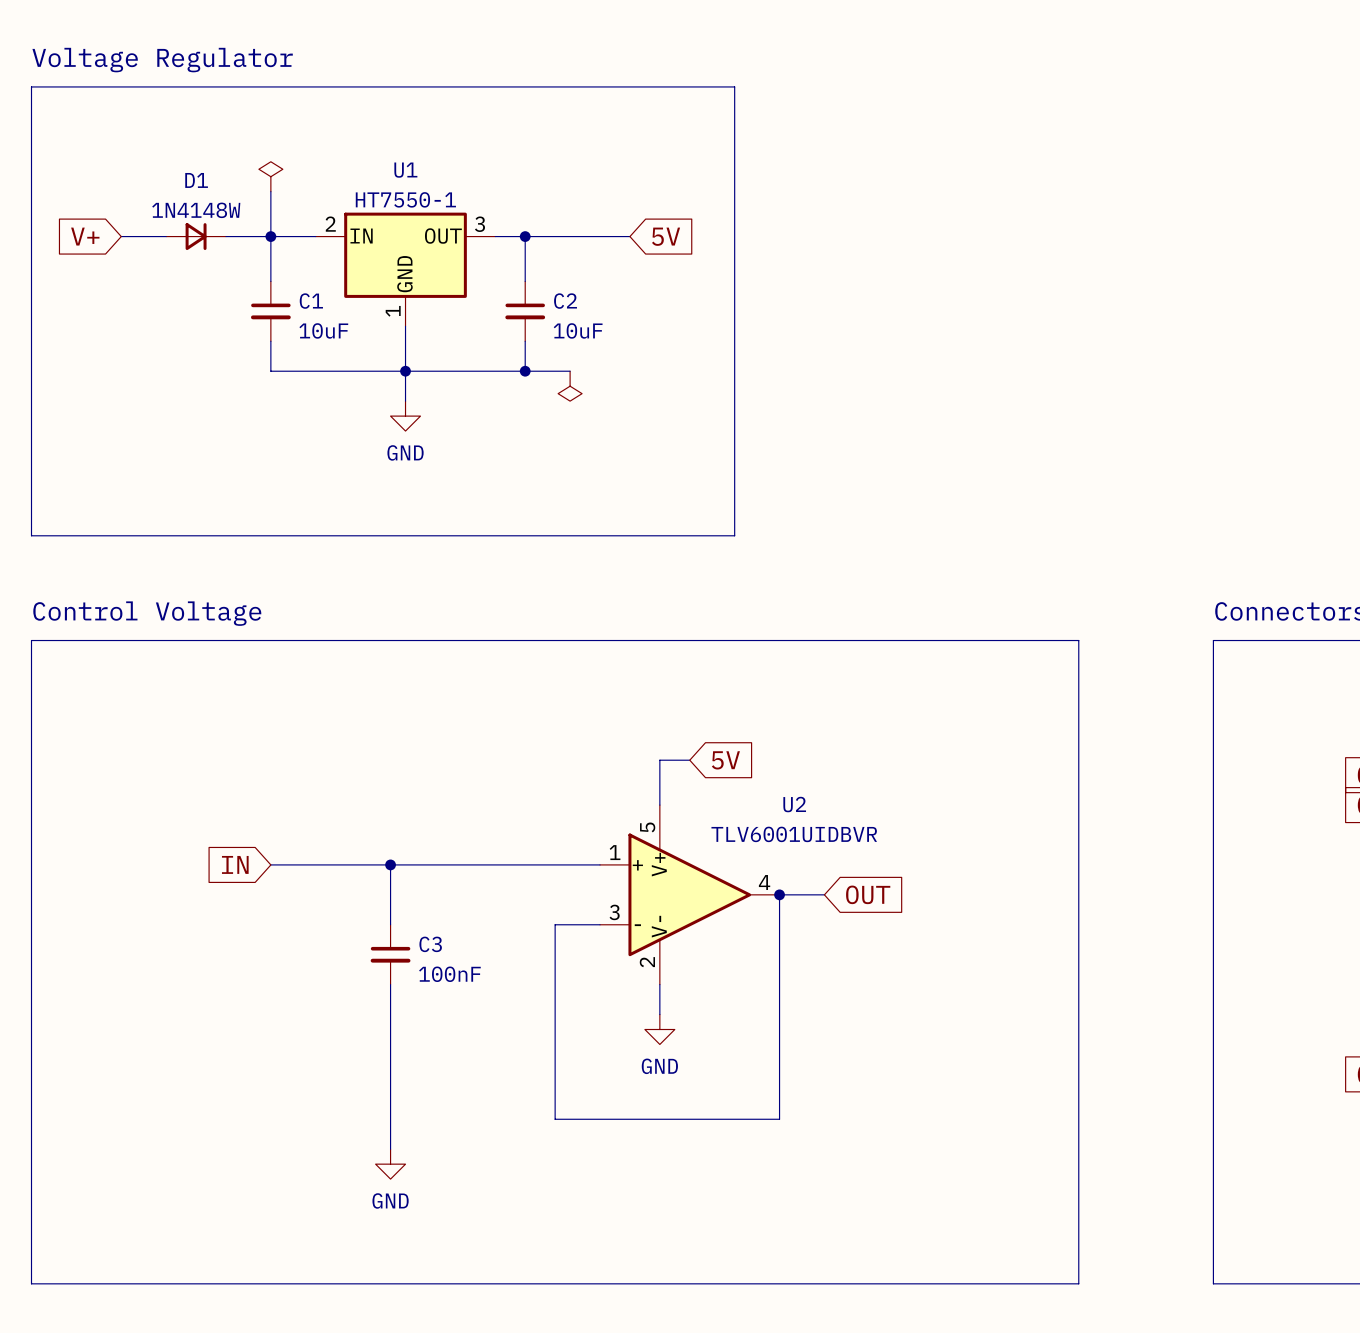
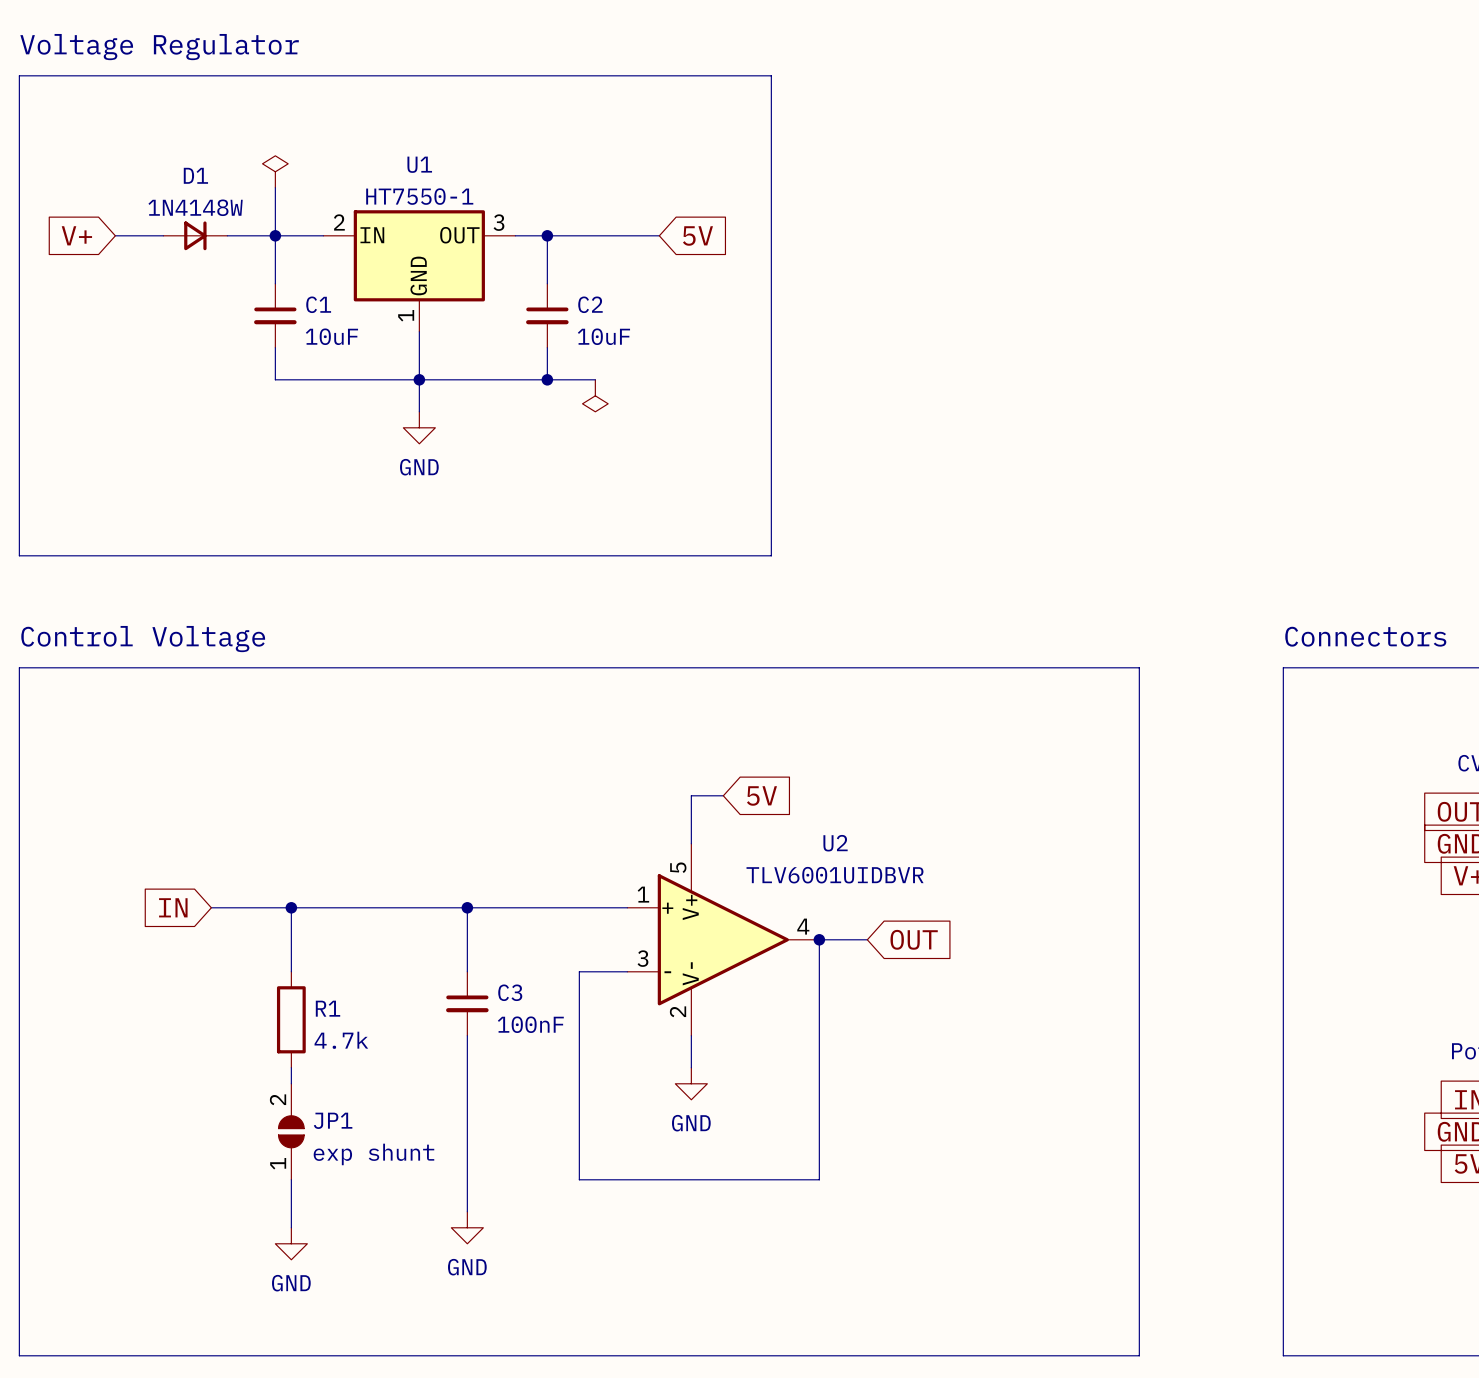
wire: none -> (211, 907) (275, 907)
global label position: IN (235, 864) -> IN (173, 907)
wire: none -> (291, 907) (291, 971)
junction: none -> (291, 907)
wire: (390, 864) (390, 924) -> (467, 907) (467, 971)
junction: (390, 864) -> none
junction: none -> (467, 907)
C3 position: (390, 954) -> (467, 1003)
R1: none -> 4.7k (291, 1019)
wire: (390, 984) (390, 1149) -> (467, 1035) (467, 1211)
wire: none -> (291, 1067) (291, 1083)
JP1: none -> exp shunt (291, 1131)
wire: none -> (291, 1179) (291, 1227)
power symbol: GND (390, 1164) -> none
power symbol: none -> GND (467, 1227)
power symbol: none -> GND (291, 1243)

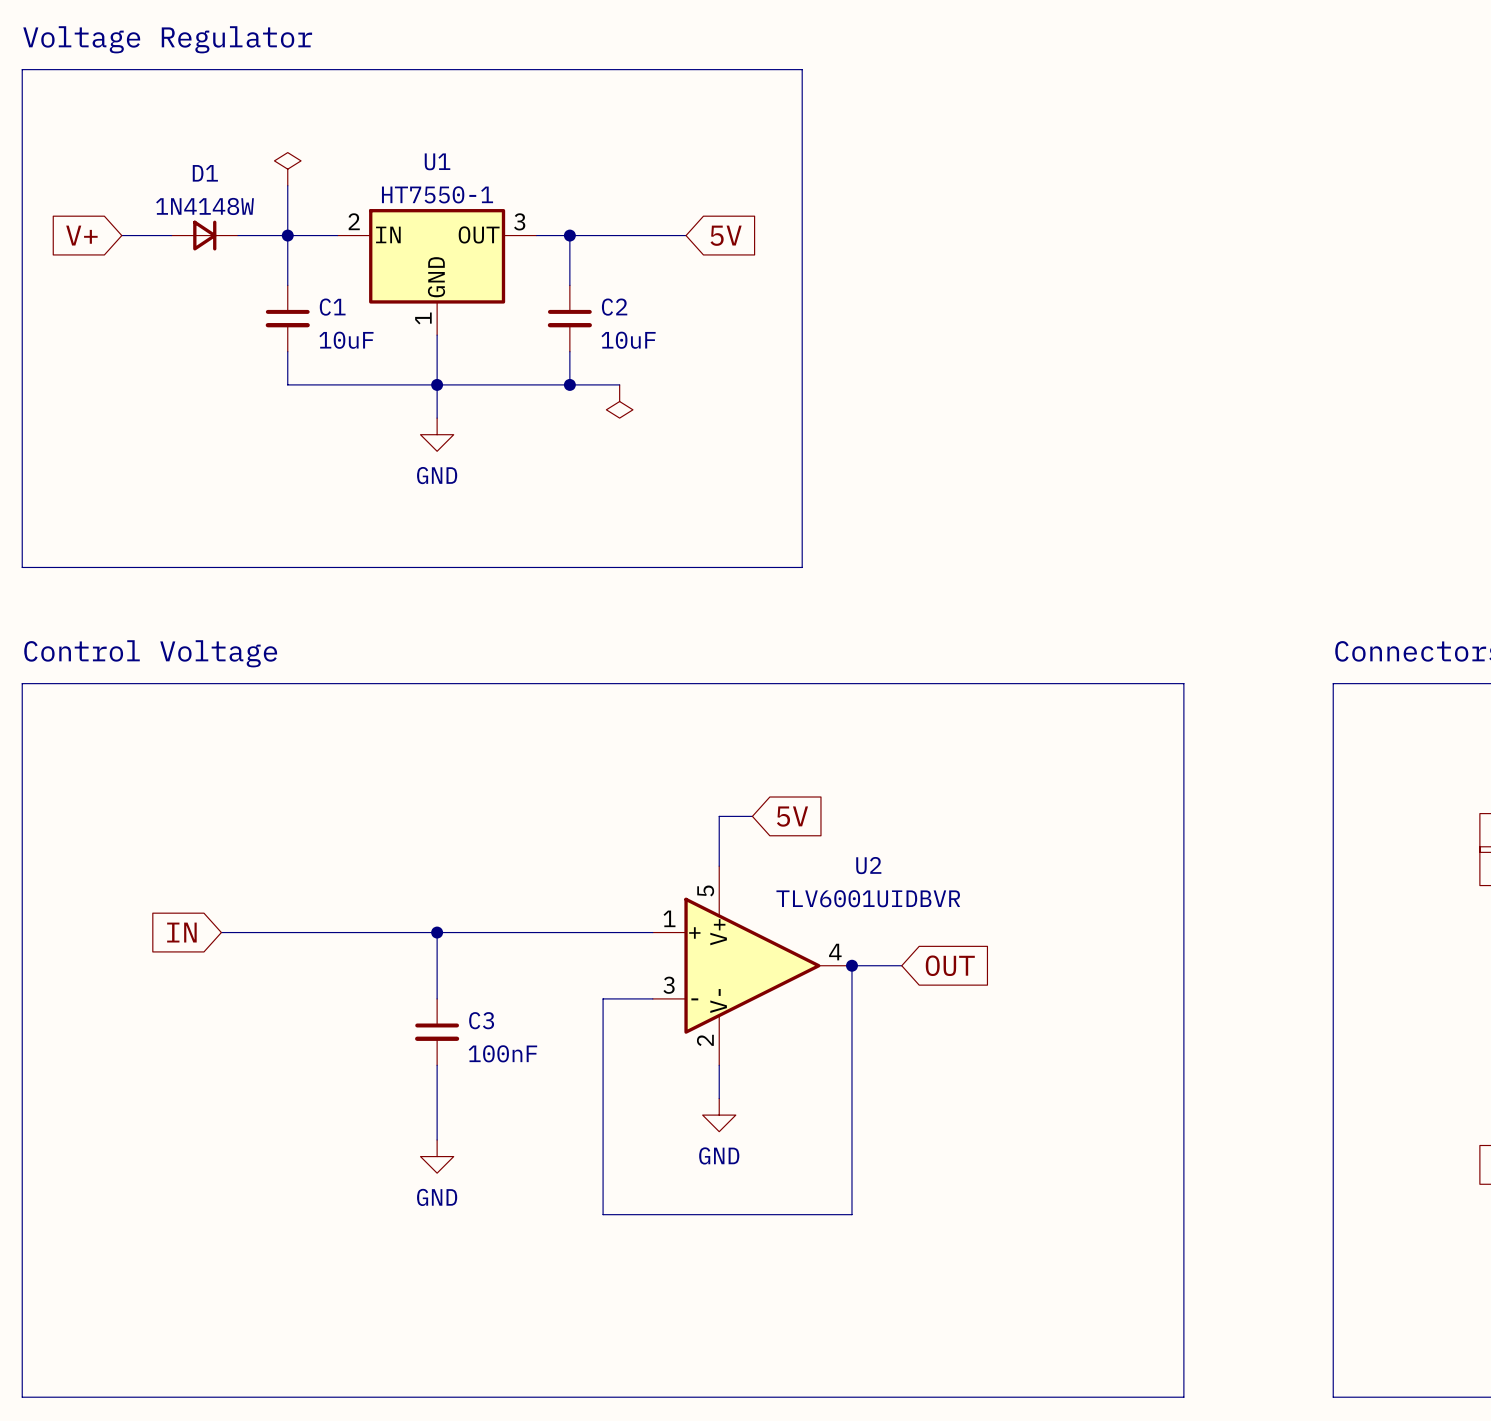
wire: (291, 907) (291, 971) -> none
junction: (291, 907) -> none
wire: (467, 907) (467, 971) -> (437, 932) (437, 998)
junction position: (467, 907) -> (437, 932)
C3 position: (467, 1003) -> (437, 1032)
R1: 4.7k (291, 1019) -> none
wire: none -> (437, 1065) (437, 1139)
wire: (467, 1035) (467, 1211) -> none
wire: (291, 1067) (291, 1083) -> none
power symbol: none -> GND (437, 1156)
JP1: exp shunt (291, 1131) -> none
wire: (291, 1179) (291, 1227) -> none
power symbol: GND (467, 1227) -> none
power symbol: GND (291, 1243) -> none

